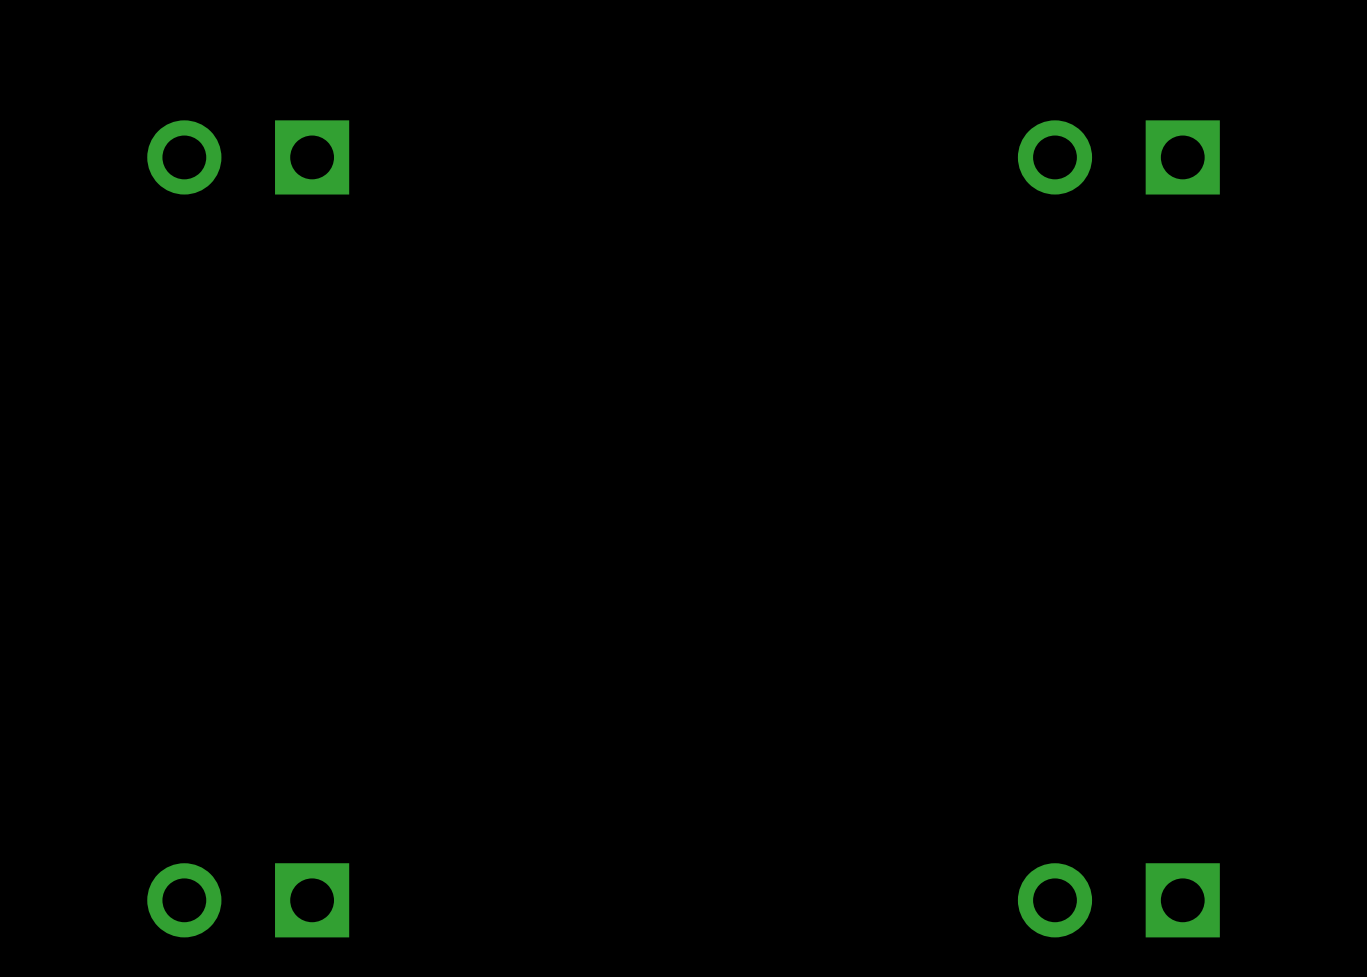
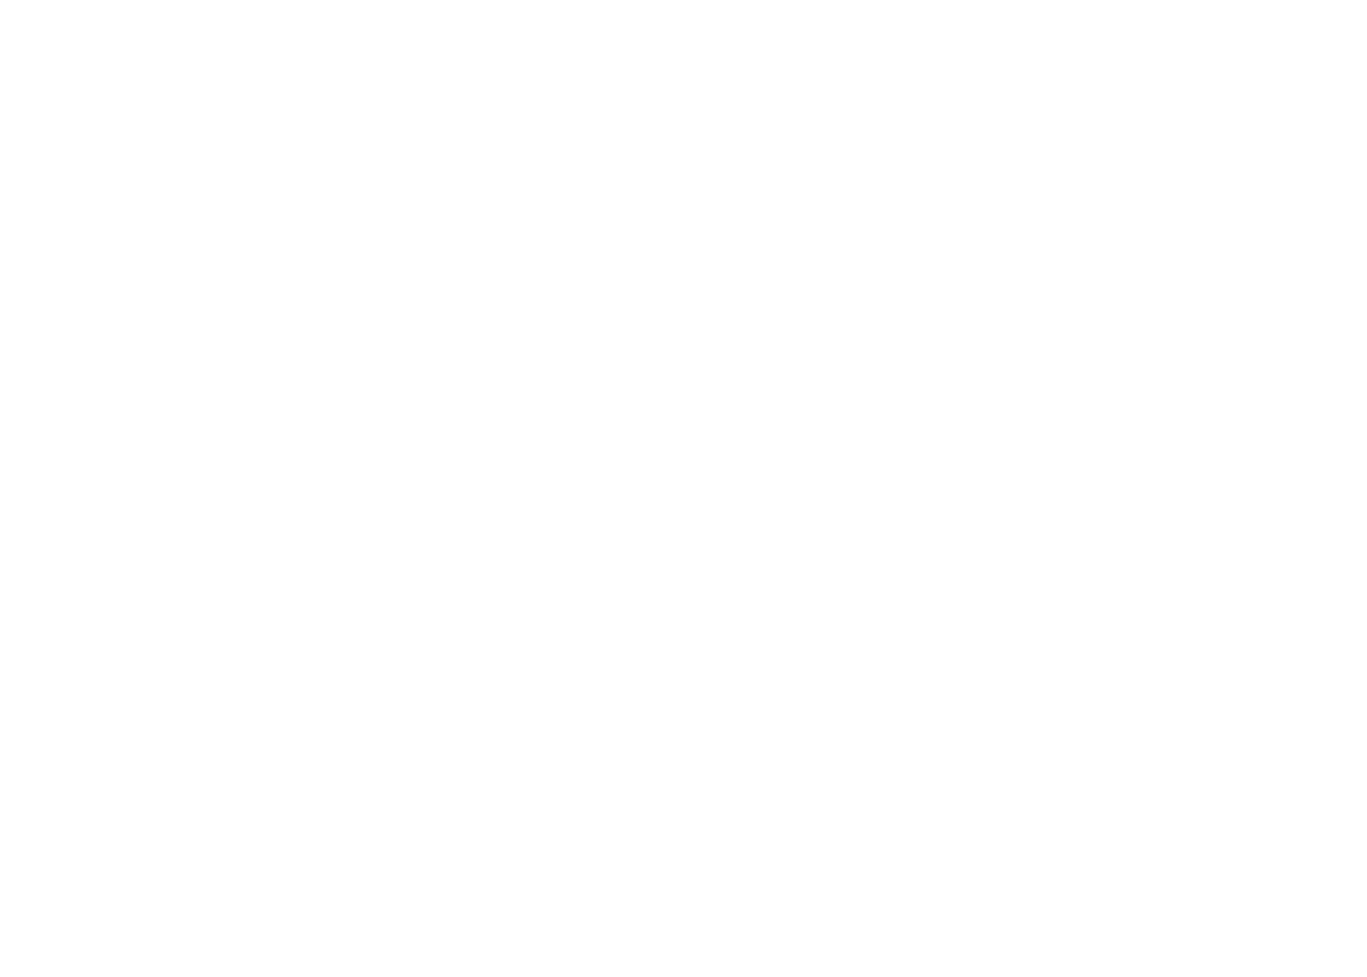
part: (248, 157) -> none
part: (1118, 157) -> none
part: (248, 900) -> none
part: (1118, 900) -> none

